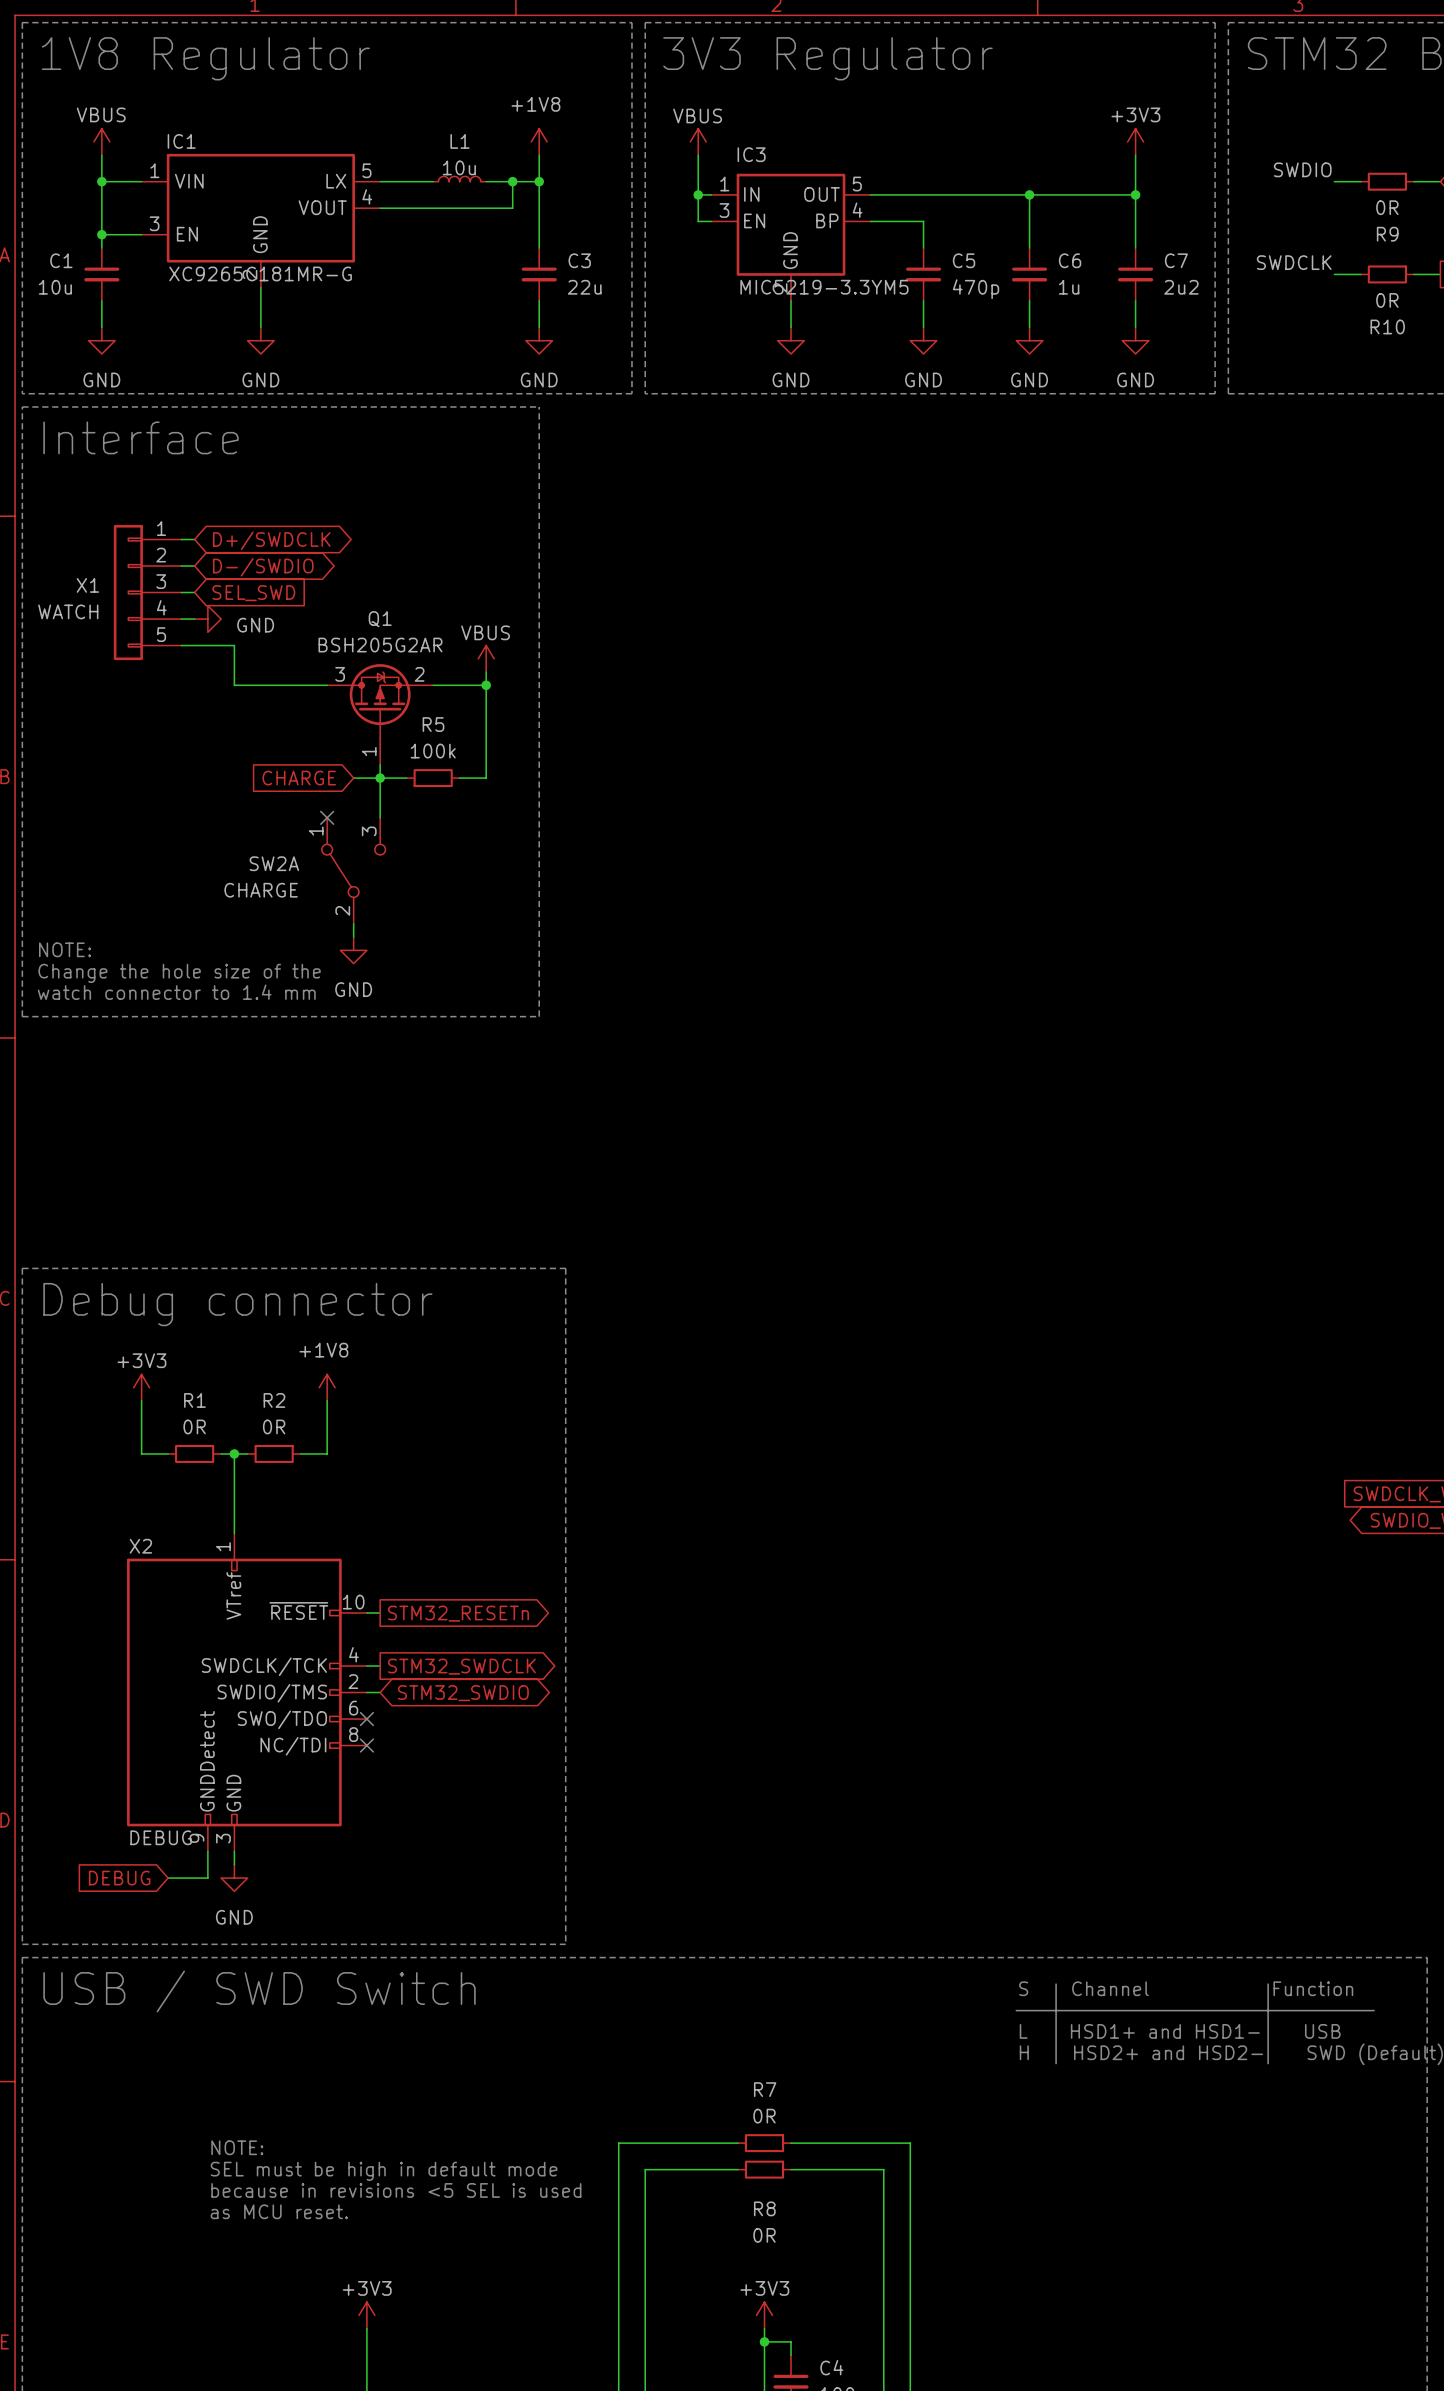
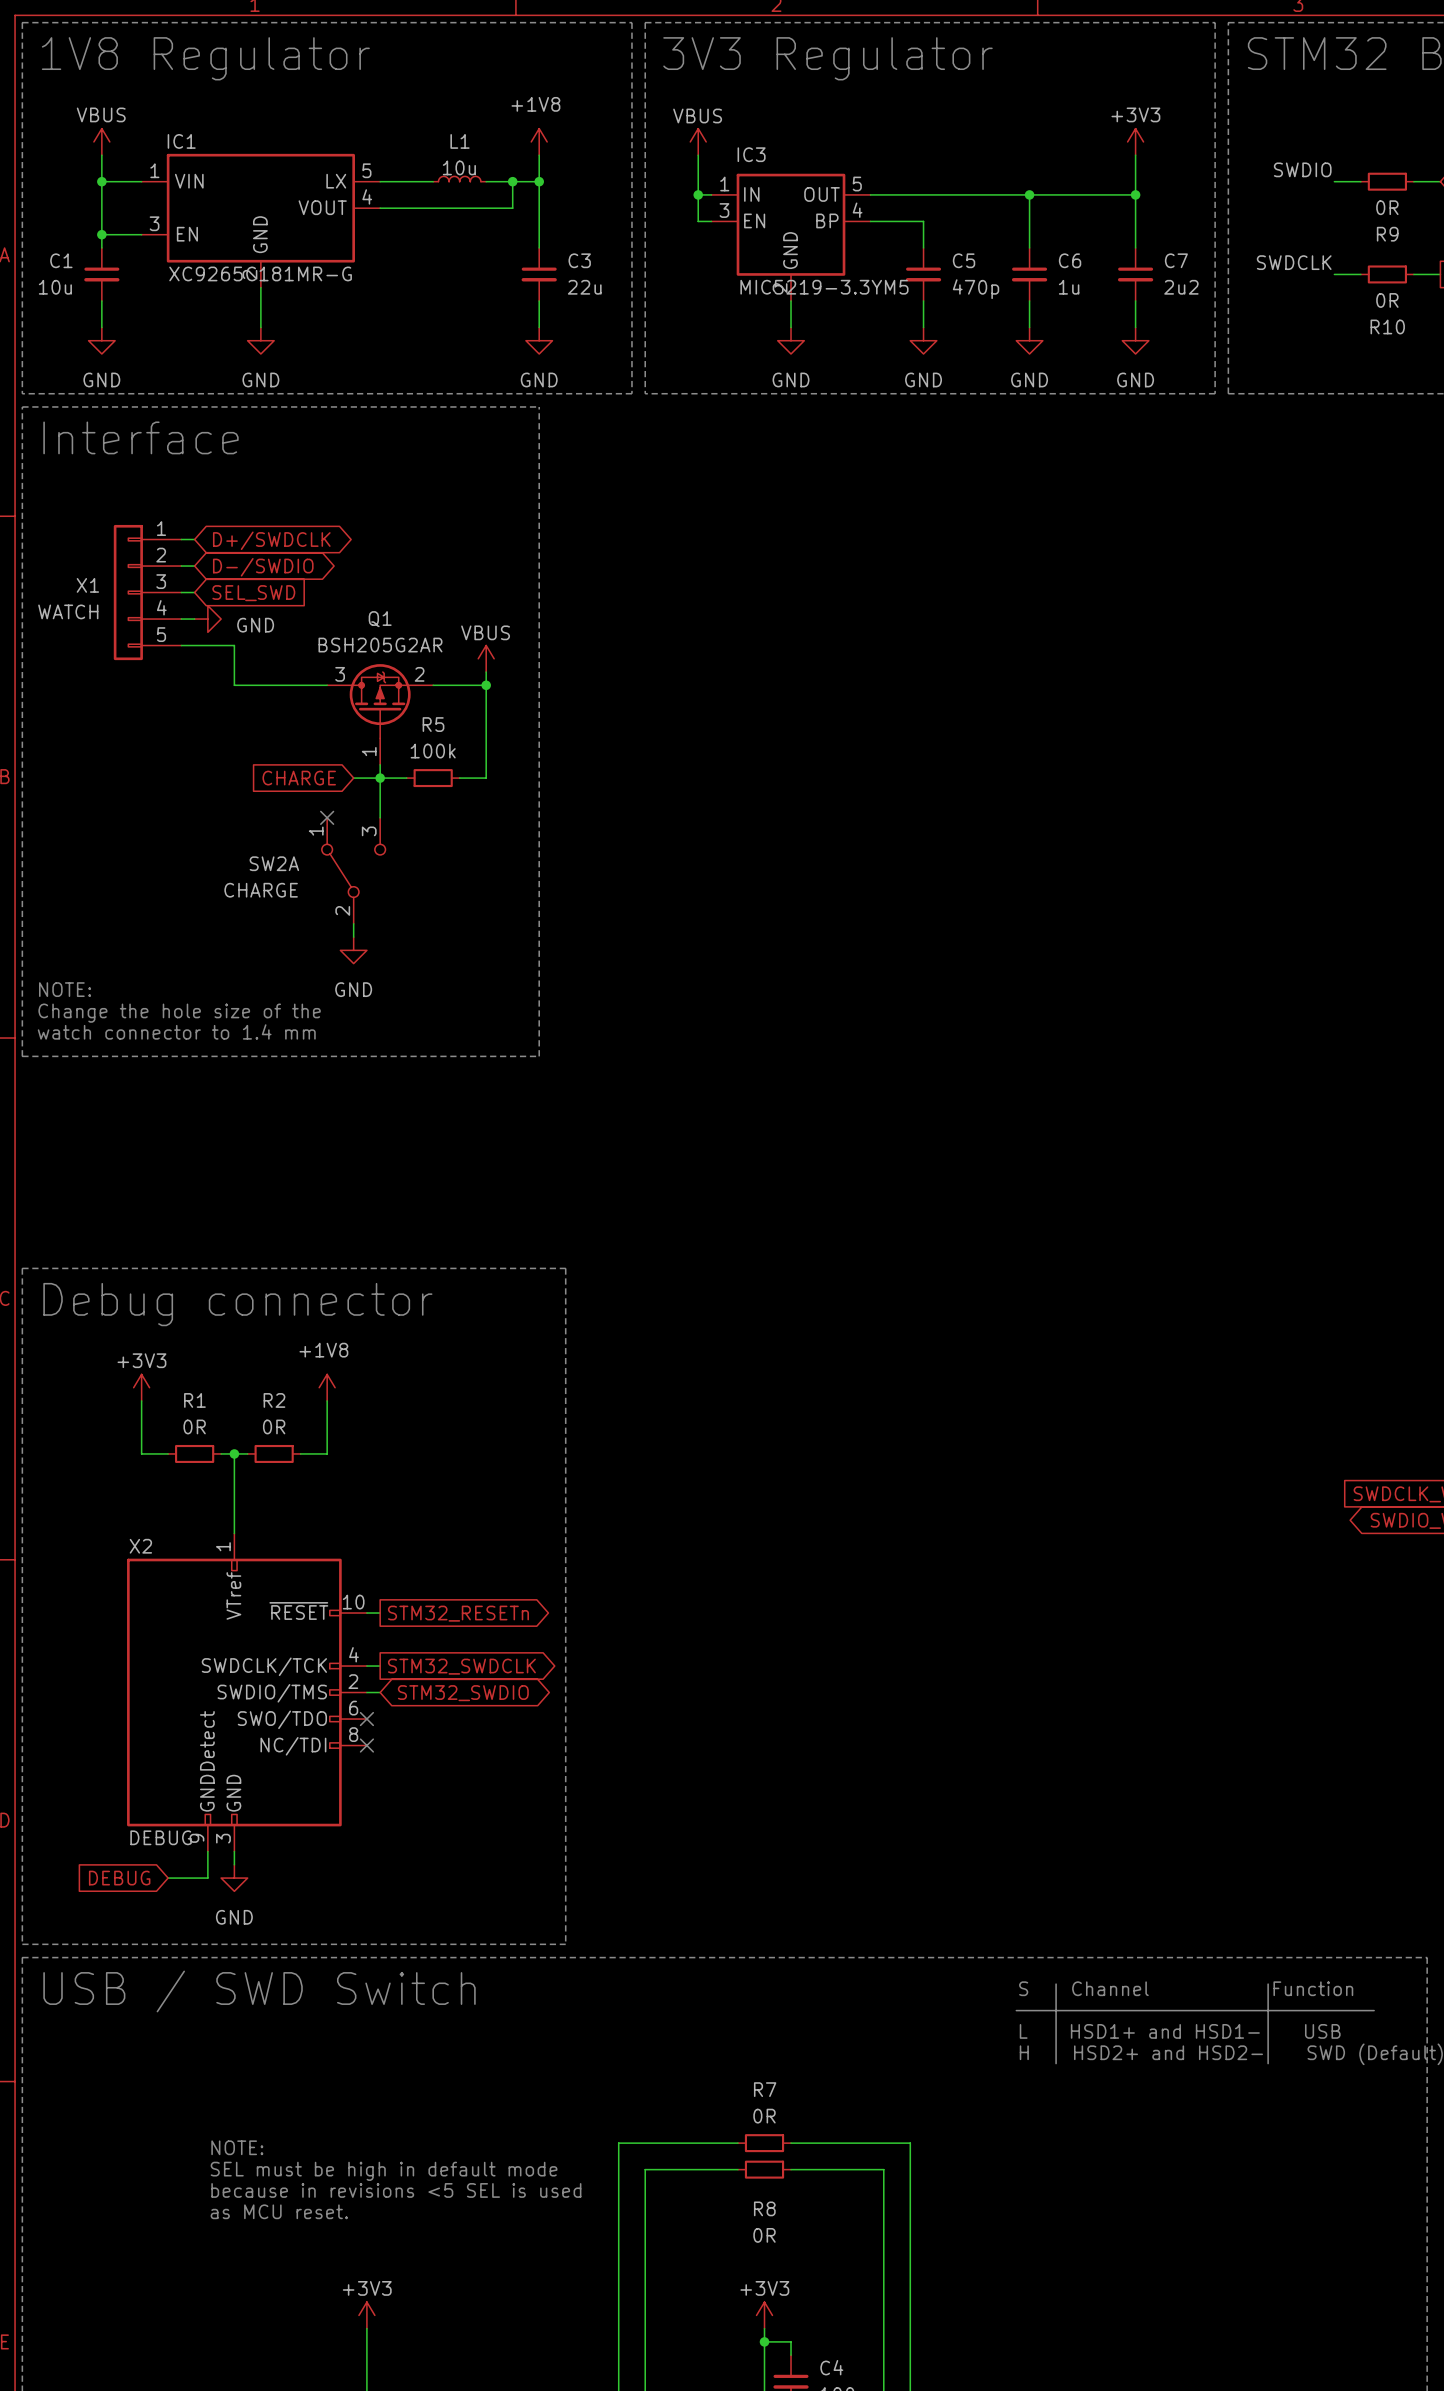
text position: NOTE: (65, 949) -> NOTE: (65, 989)
text position: Change the hole size of the (179, 973) -> Change the hole size of the (179, 1013)
text position: watch connector to 1.4 mm (176, 992) -> watch connector to 1.4 mm (176, 1031)
line: (22, 1016) (539, 1016) -> (22, 1016) (22, 1056) (539, 1056) (539, 1016)

